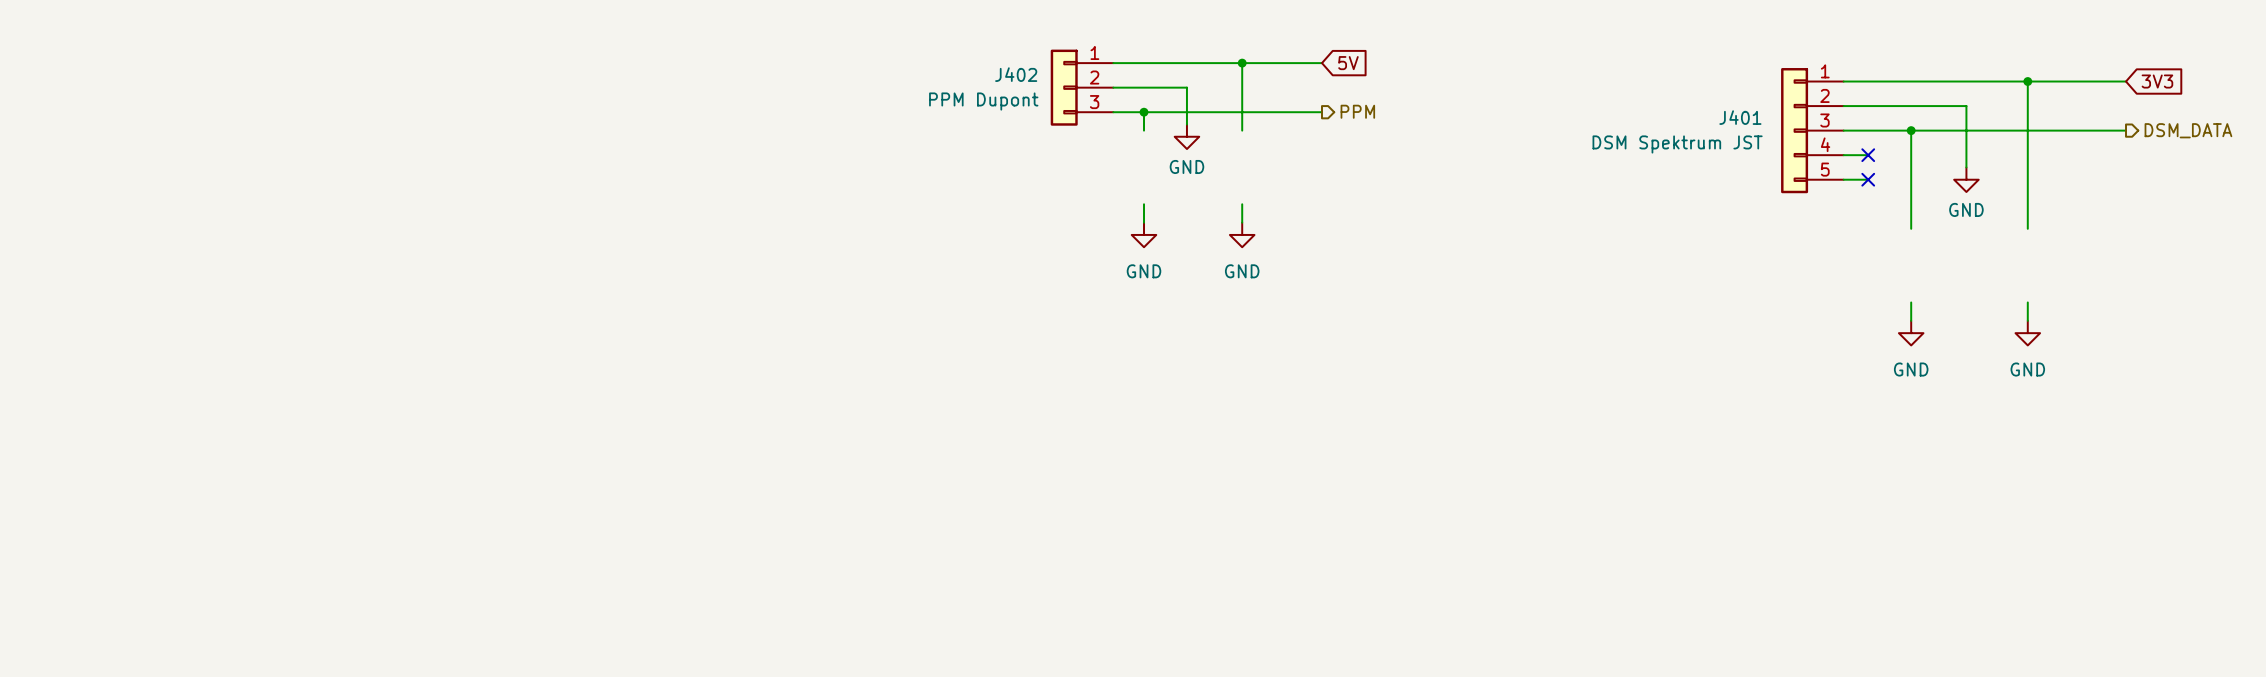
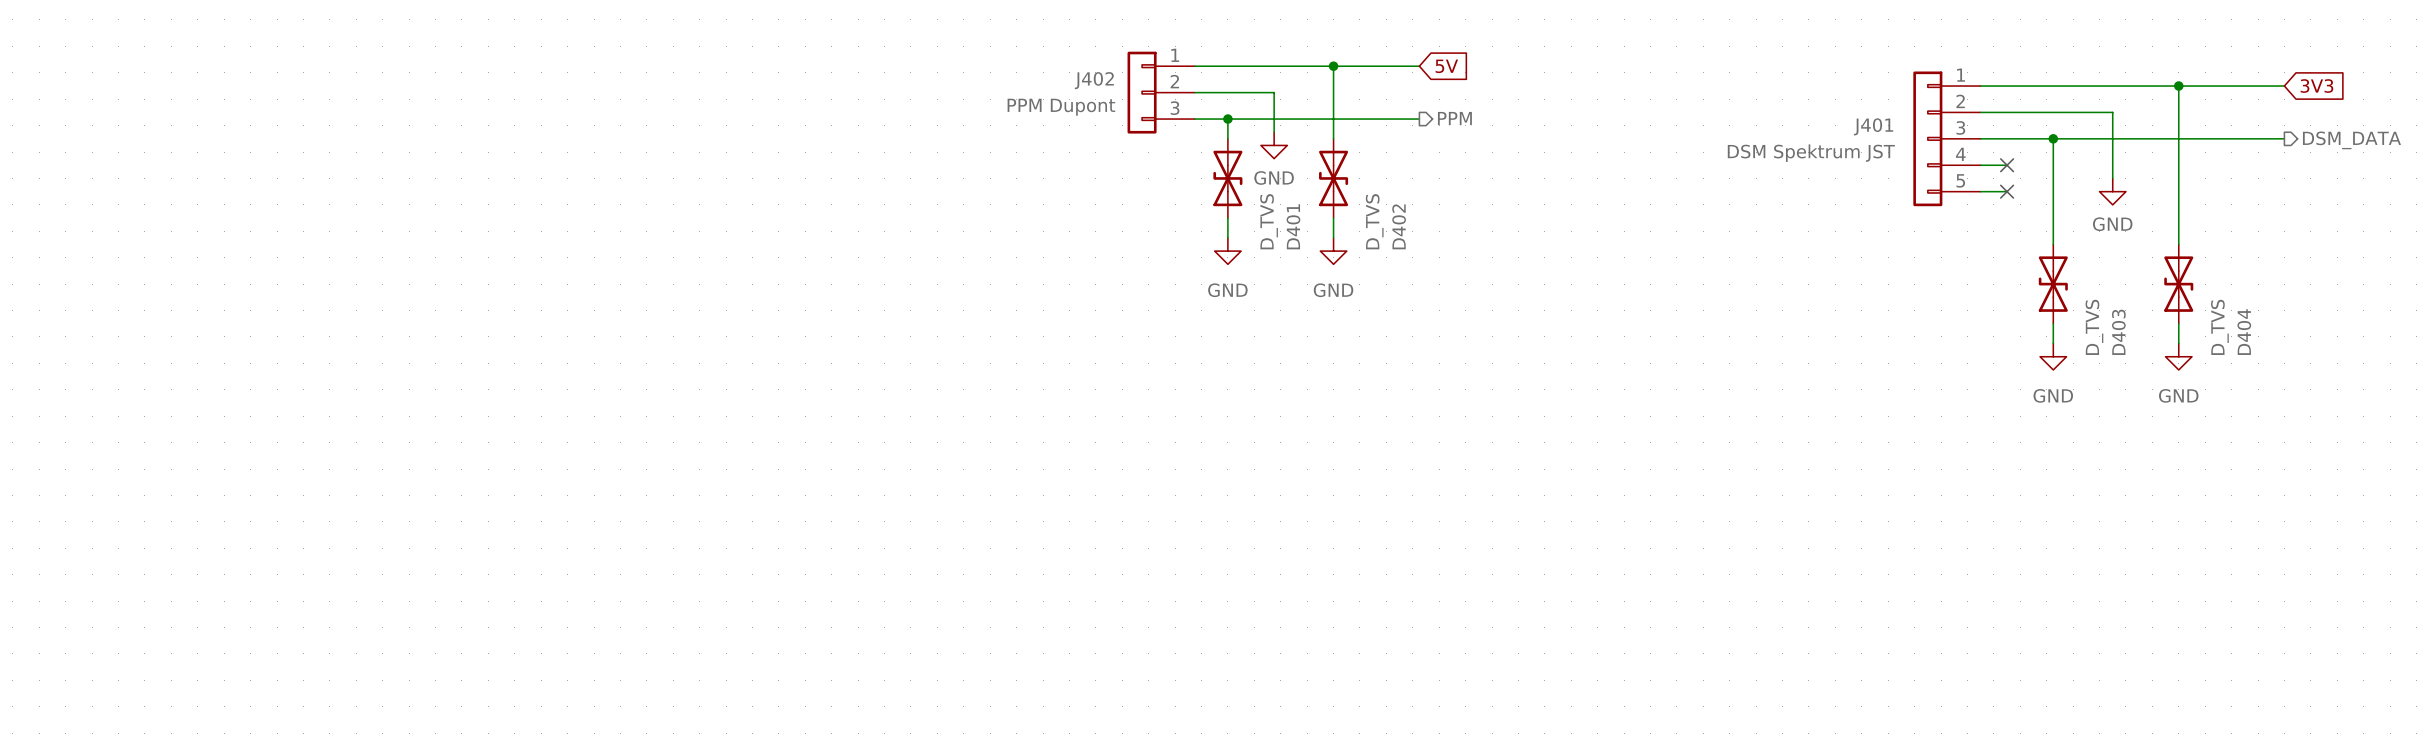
D401: none -> D_TVS (1227, 178)
D402: none -> D_TVS (1333, 178)
D403: none -> D_TVS (2053, 284)
D404: none -> D_TVS (2178, 284)

